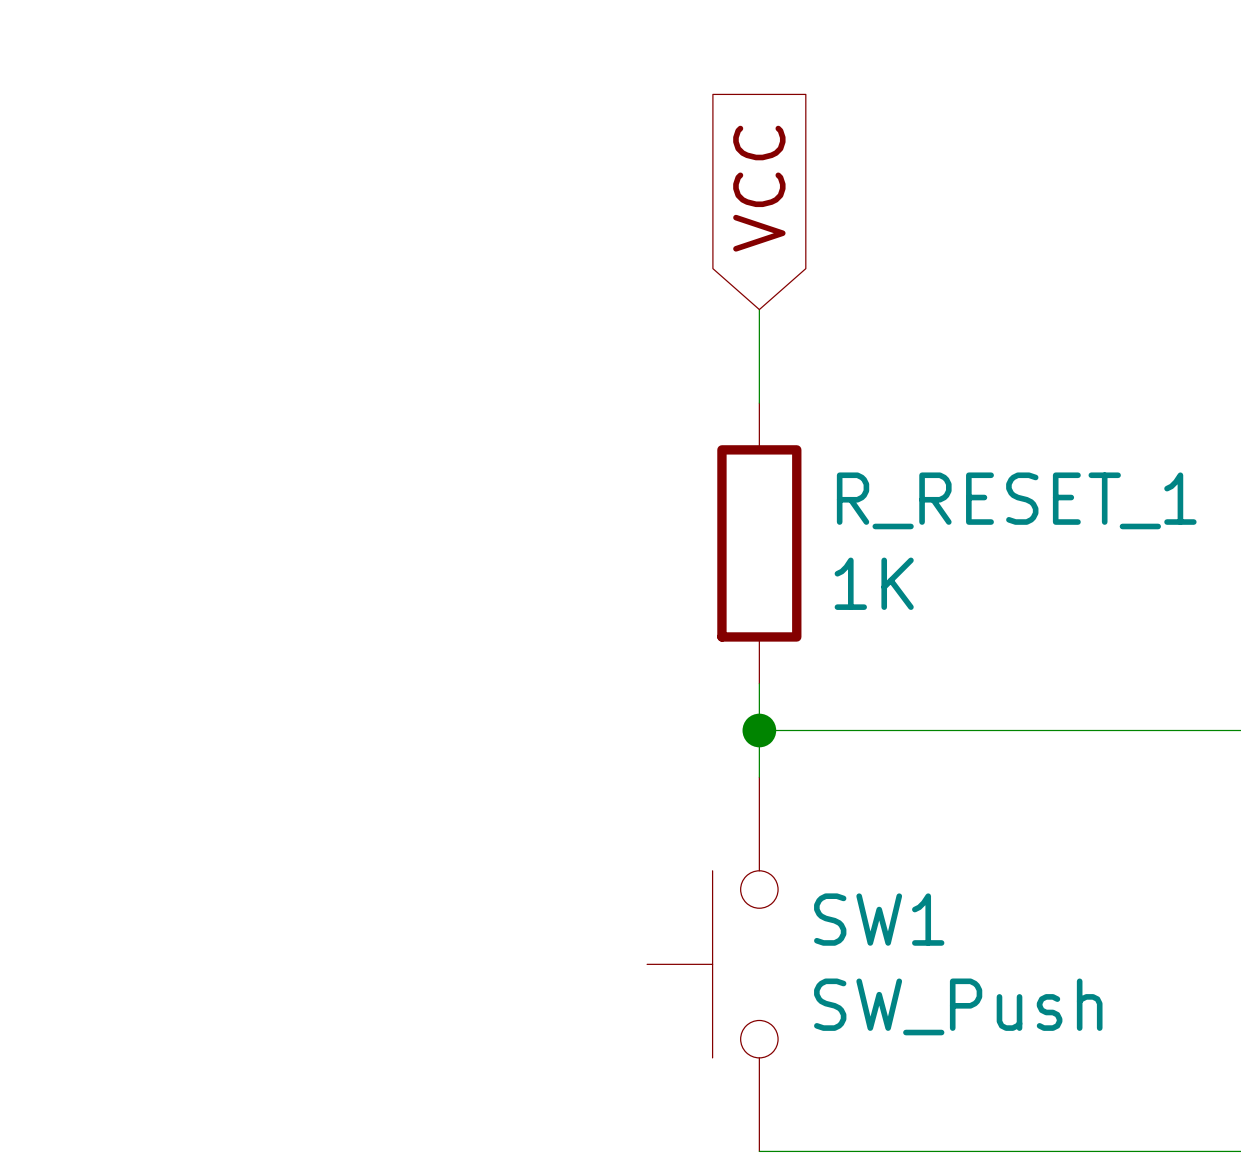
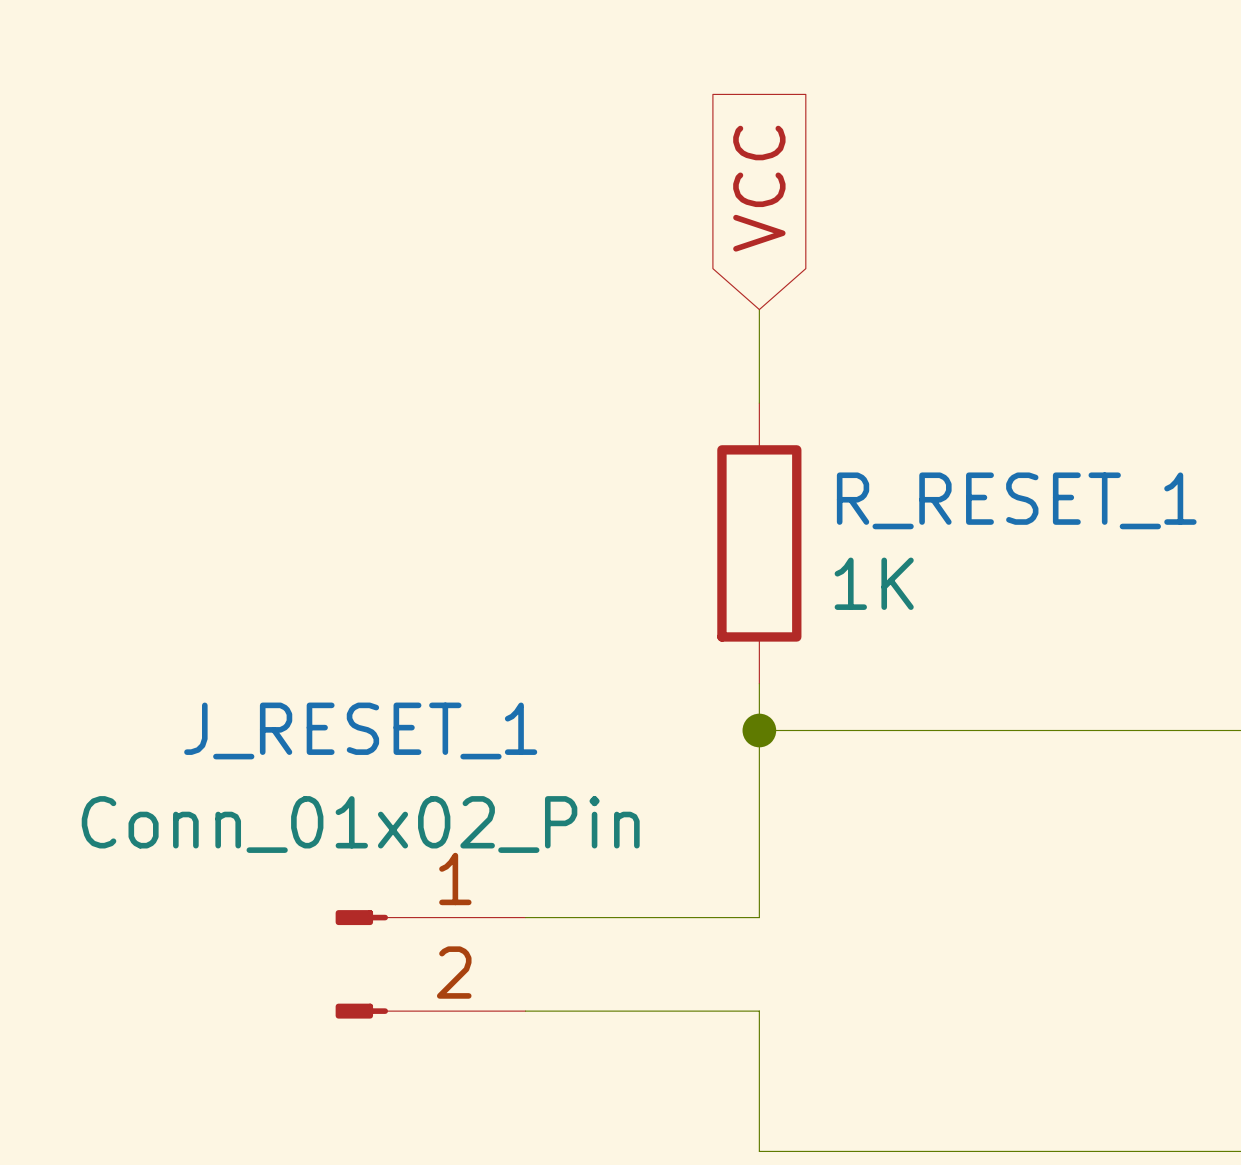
wire: none -> (759, 777) (759, 917) (525, 917)
J_RESET_1: none -> Conn_01x02_Pin (430, 964)
SW1: SW_Push (712, 964) -> none
wire: none -> (525, 1011) (759, 1011) (759, 1151)

